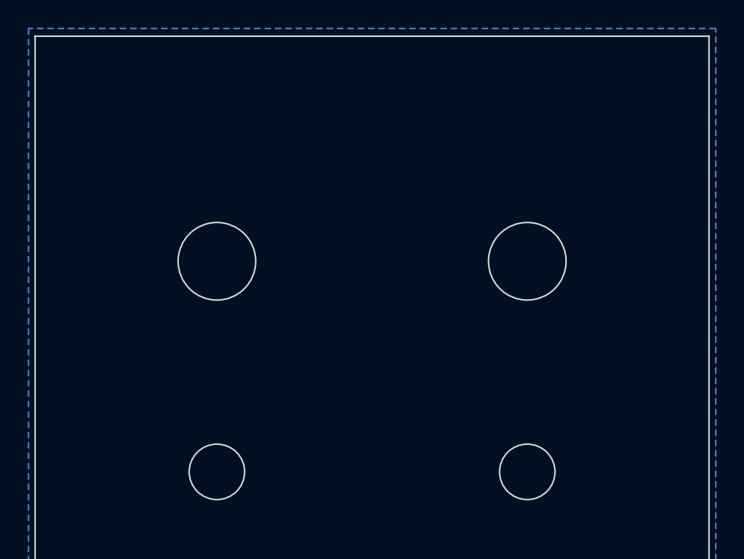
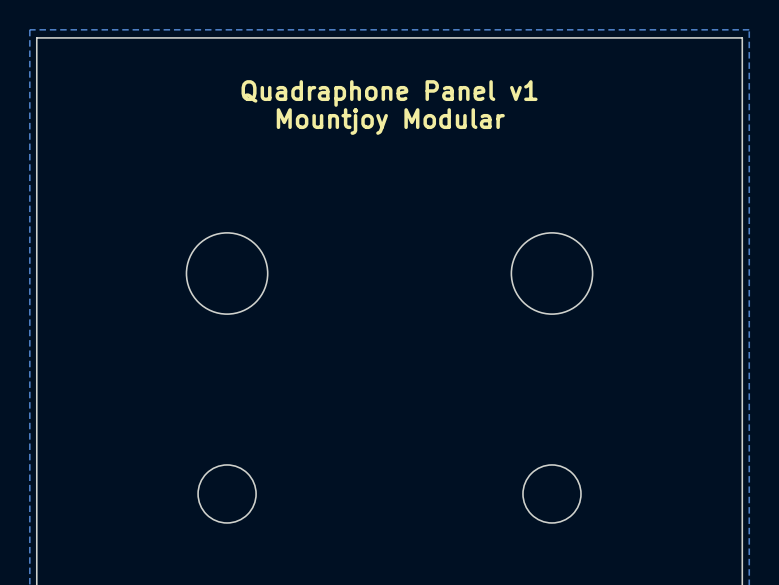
text: none -> Quadraphone Panel v1 (389, 93)
text: none -> Mountjoy Modular (390, 121)

